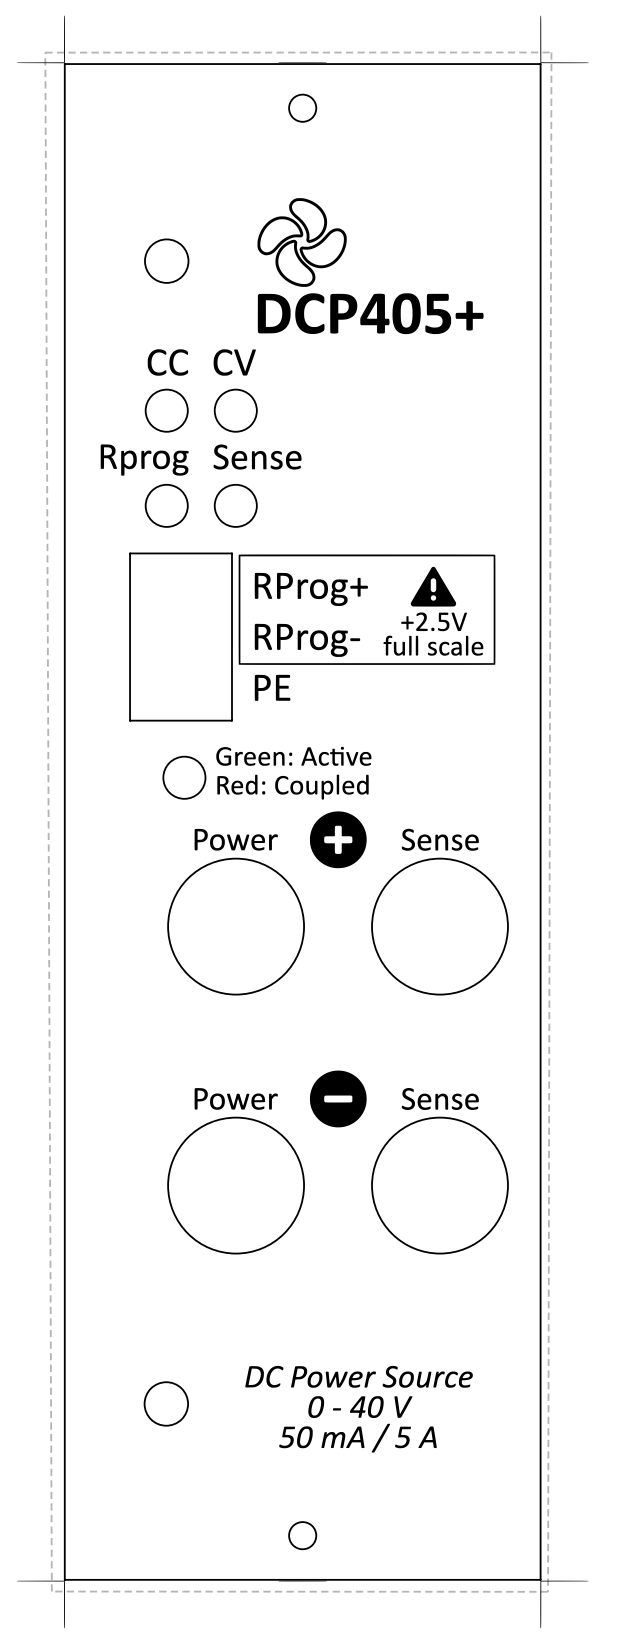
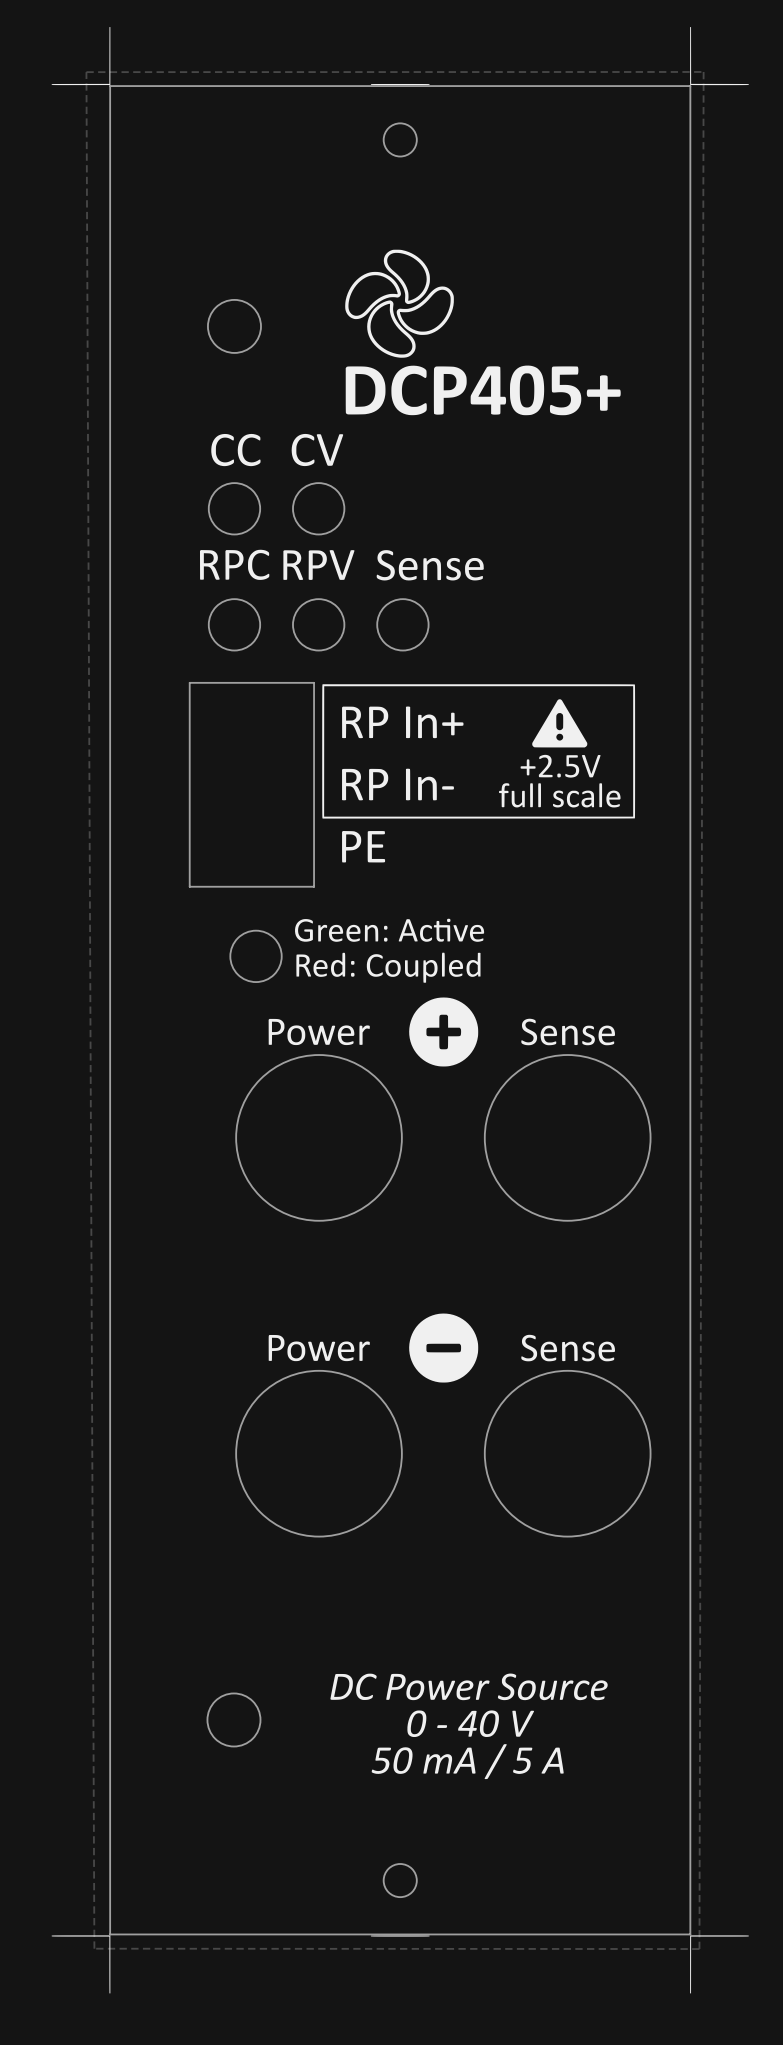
drawing shape: [16, 15, 589, 1629] -> [51, 27, 749, 1994]
round board edge: none -> [376, 598, 430, 651]

